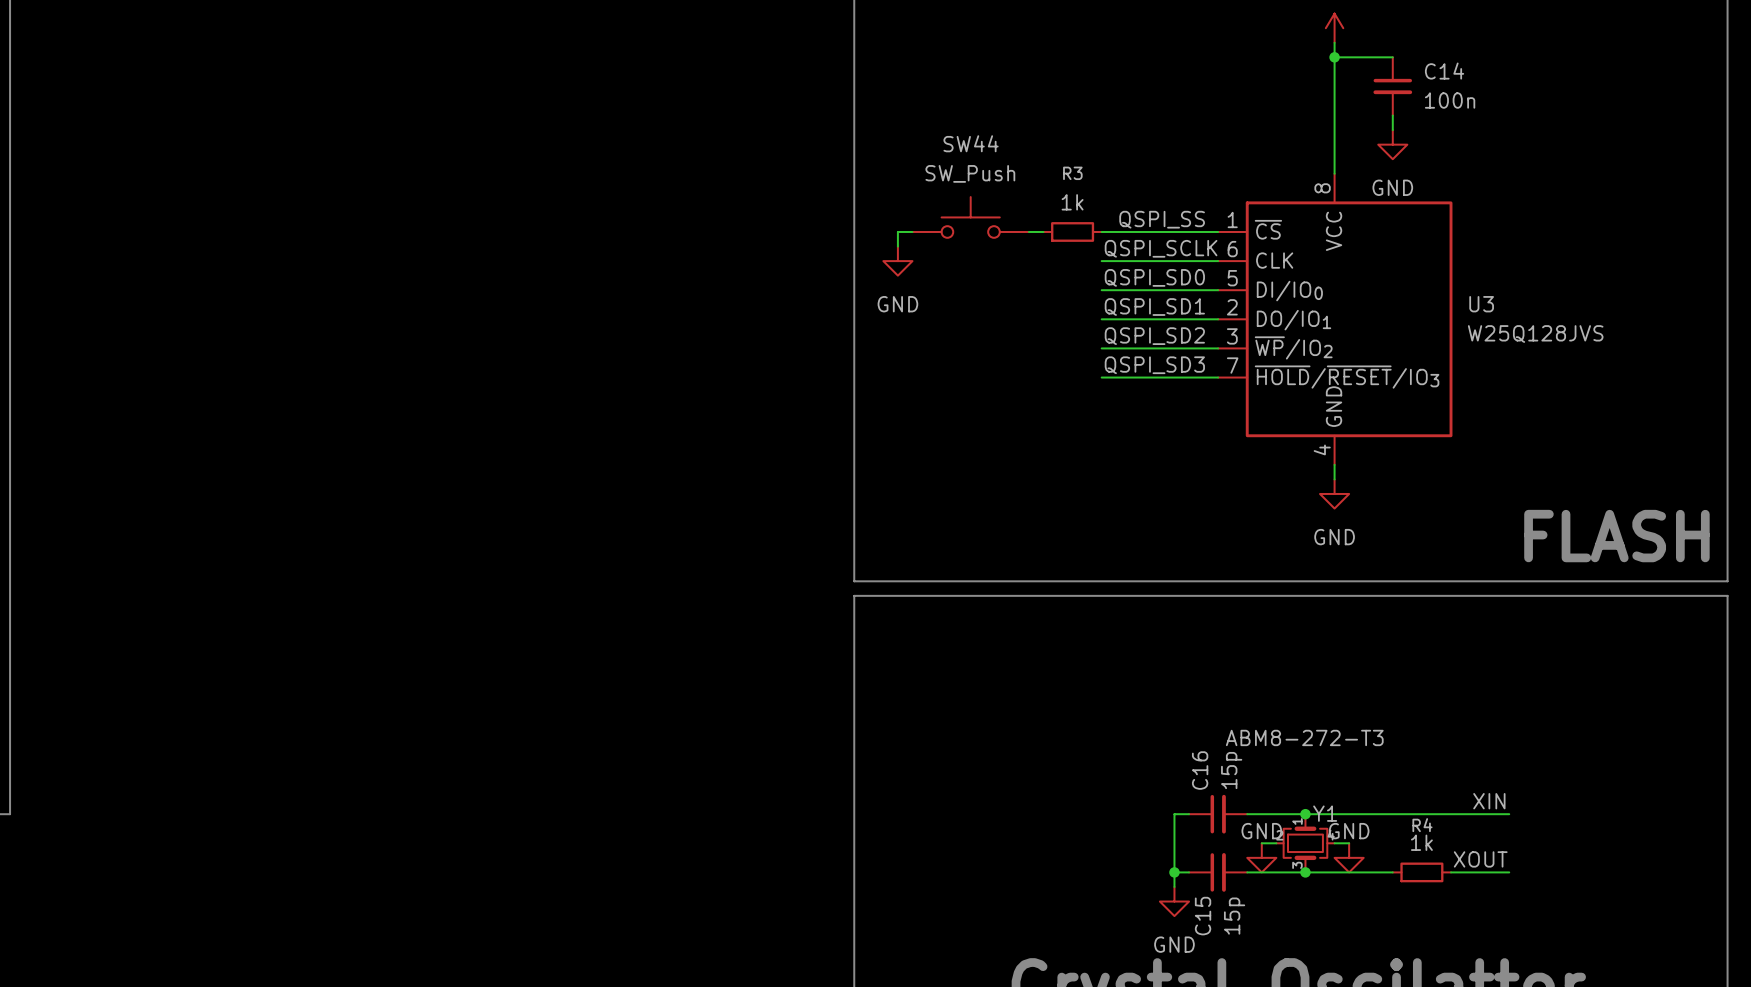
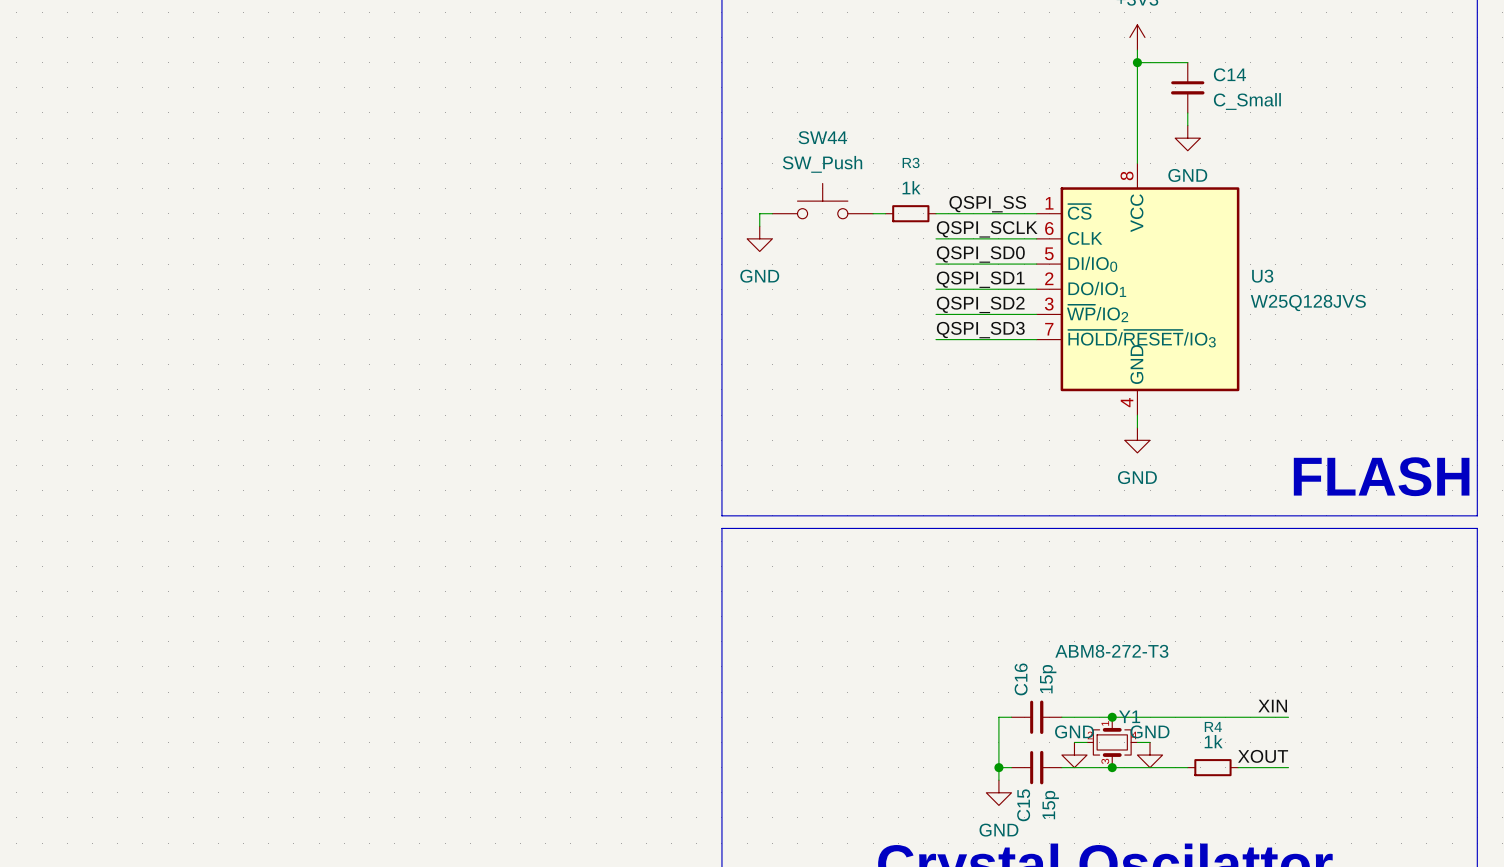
C14 value: 100n (1450, 100) -> C_Small (1247, 101)

